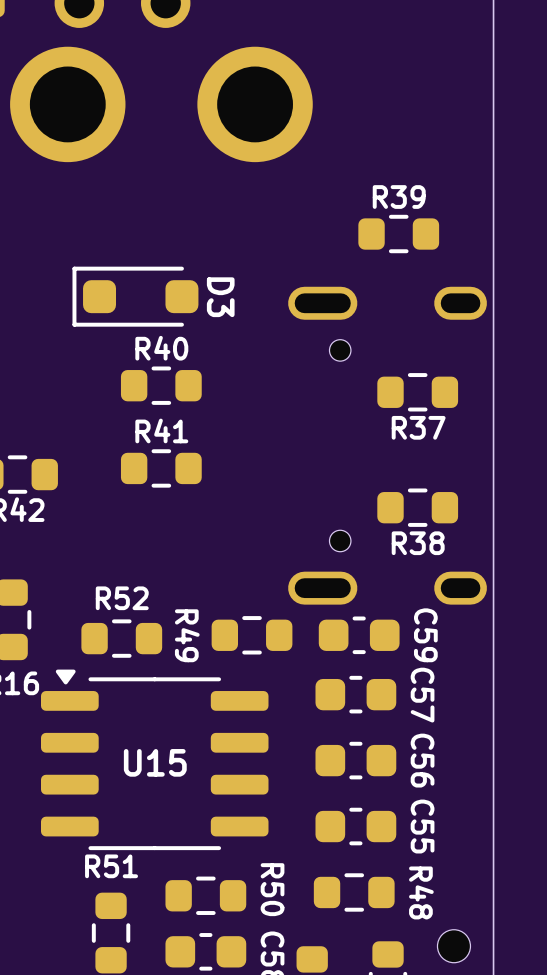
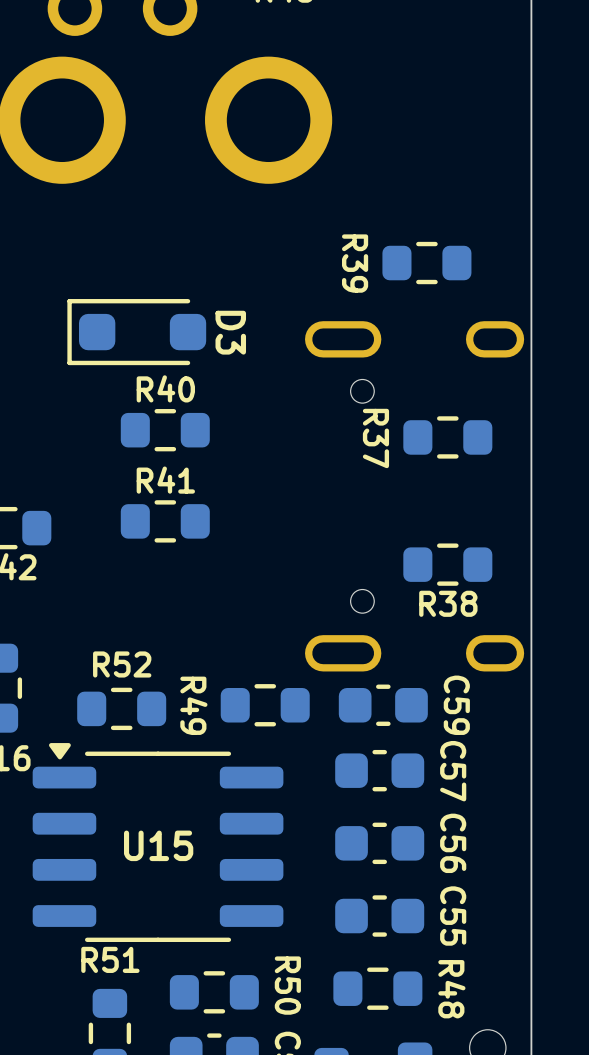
R39 name rotation: 0° (399, 197) -> 90° clockwise (355, 263)
R39 name position: R39 (399, 197) -> R39 (355, 263)
R37 name rotation: 0° (418, 427) -> 90° clockwise (375, 438)
R37 name position: R37 (418, 427) -> R37 (375, 438)

